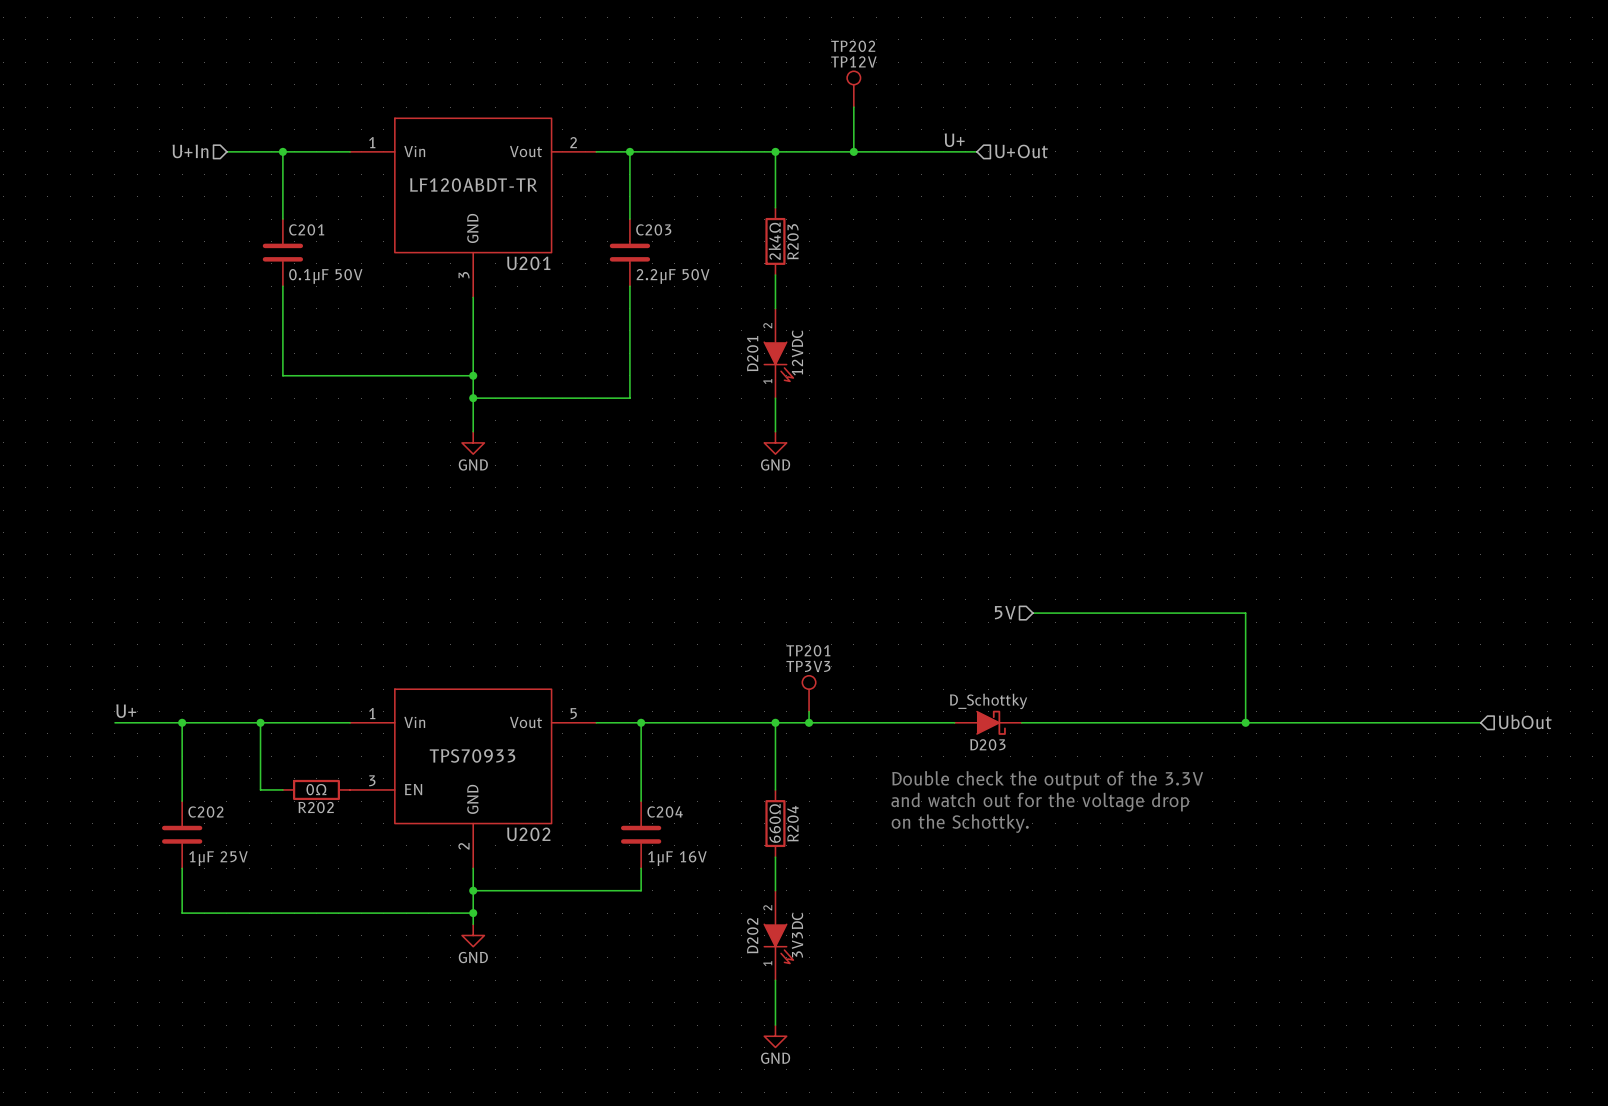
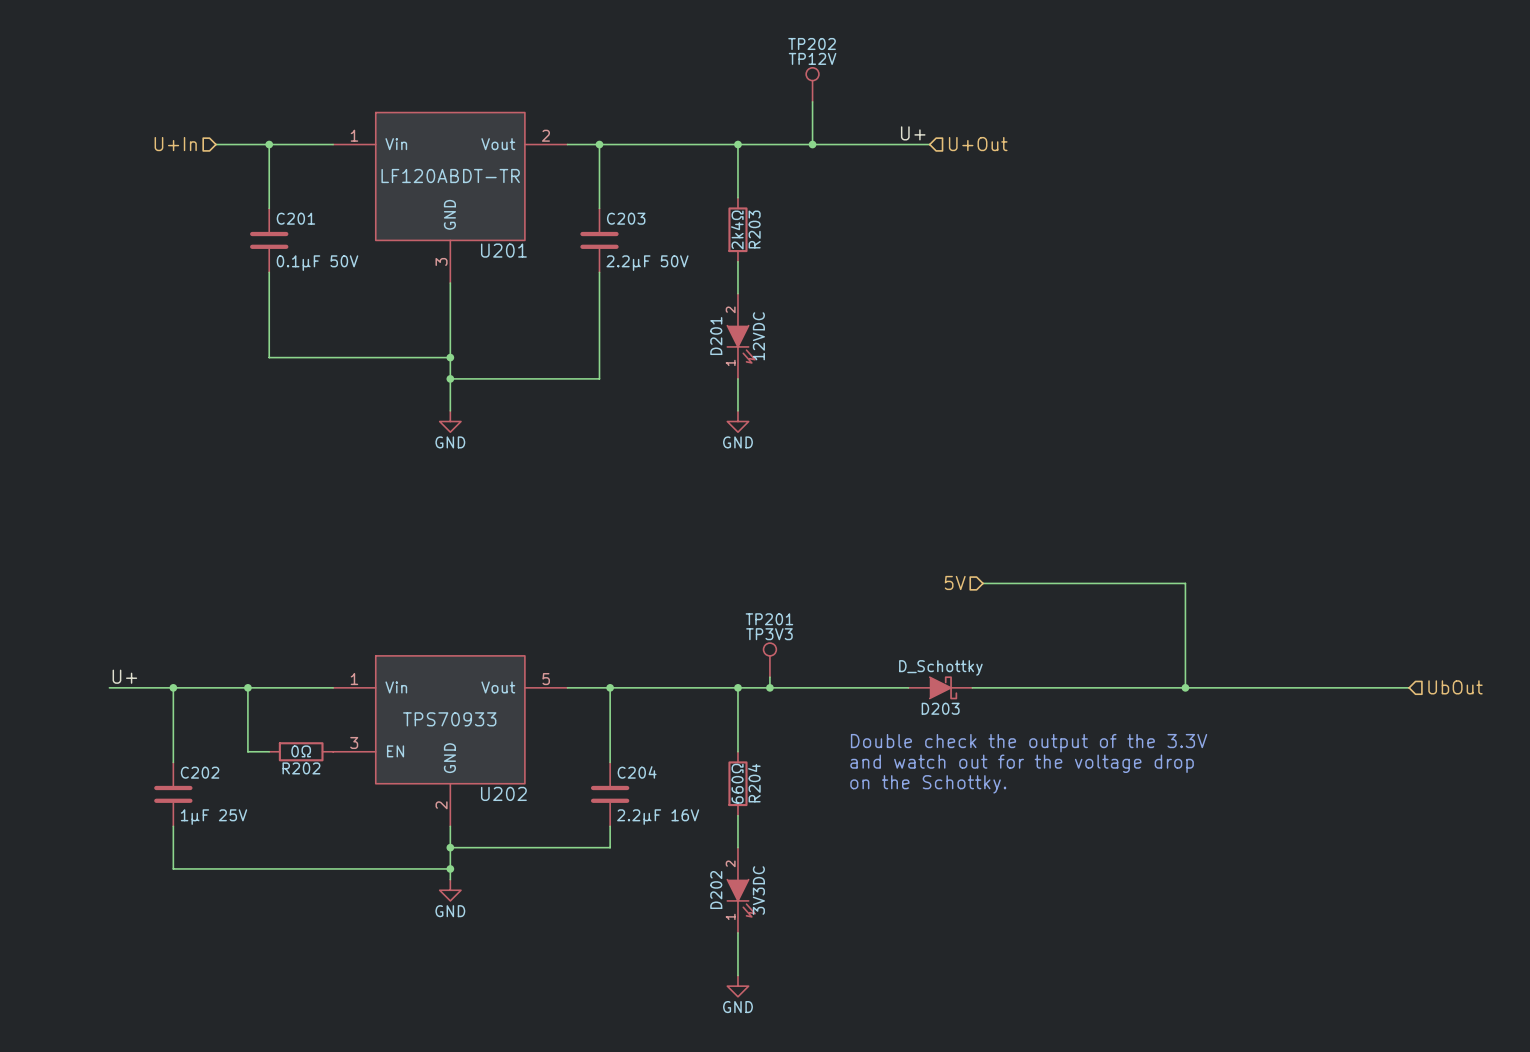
C204 value: 1μF 16V (677, 858) -> 2.2μF 16V (658, 817)

